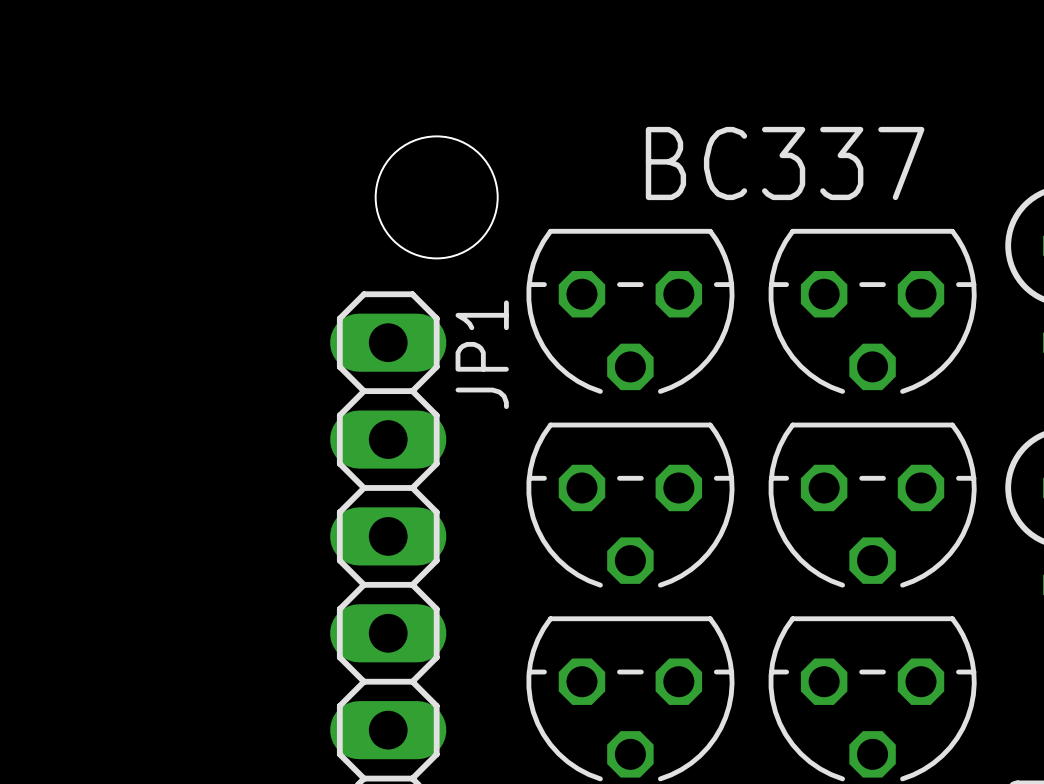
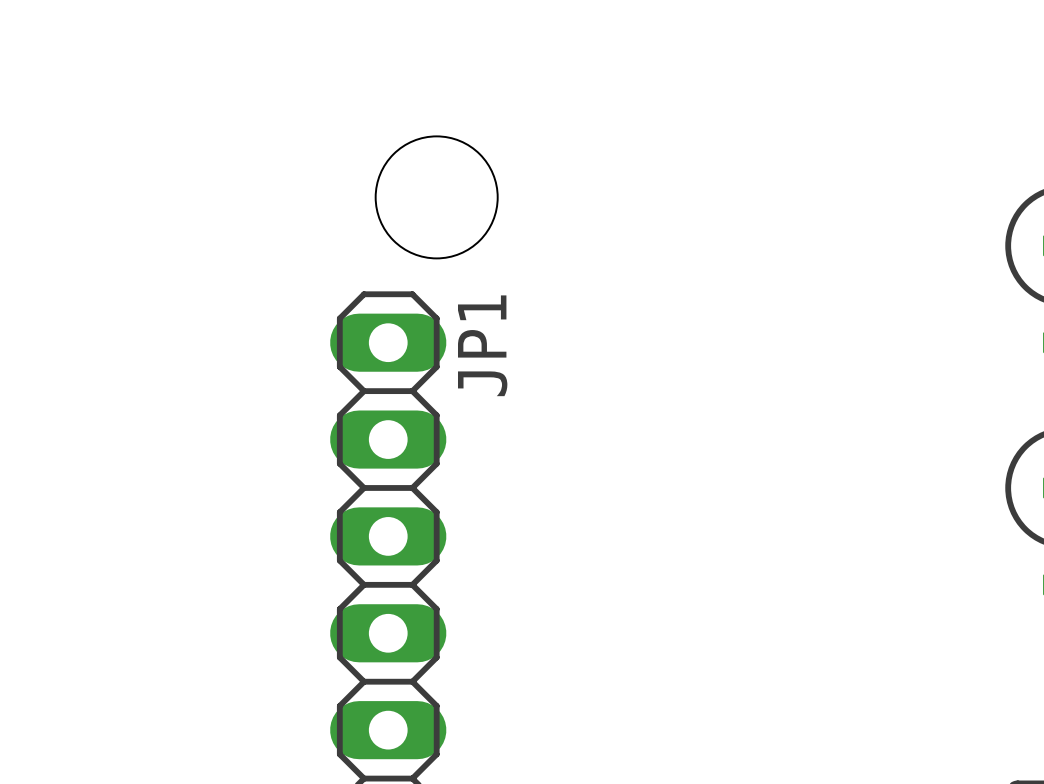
text: BC337 (785, 163) -> none
part: (630, 311) -> none
part: (872, 311) -> none
part: (630, 505) -> none
part: (872, 505) -> none
part: (630, 698) -> none
part: (872, 698) -> none

